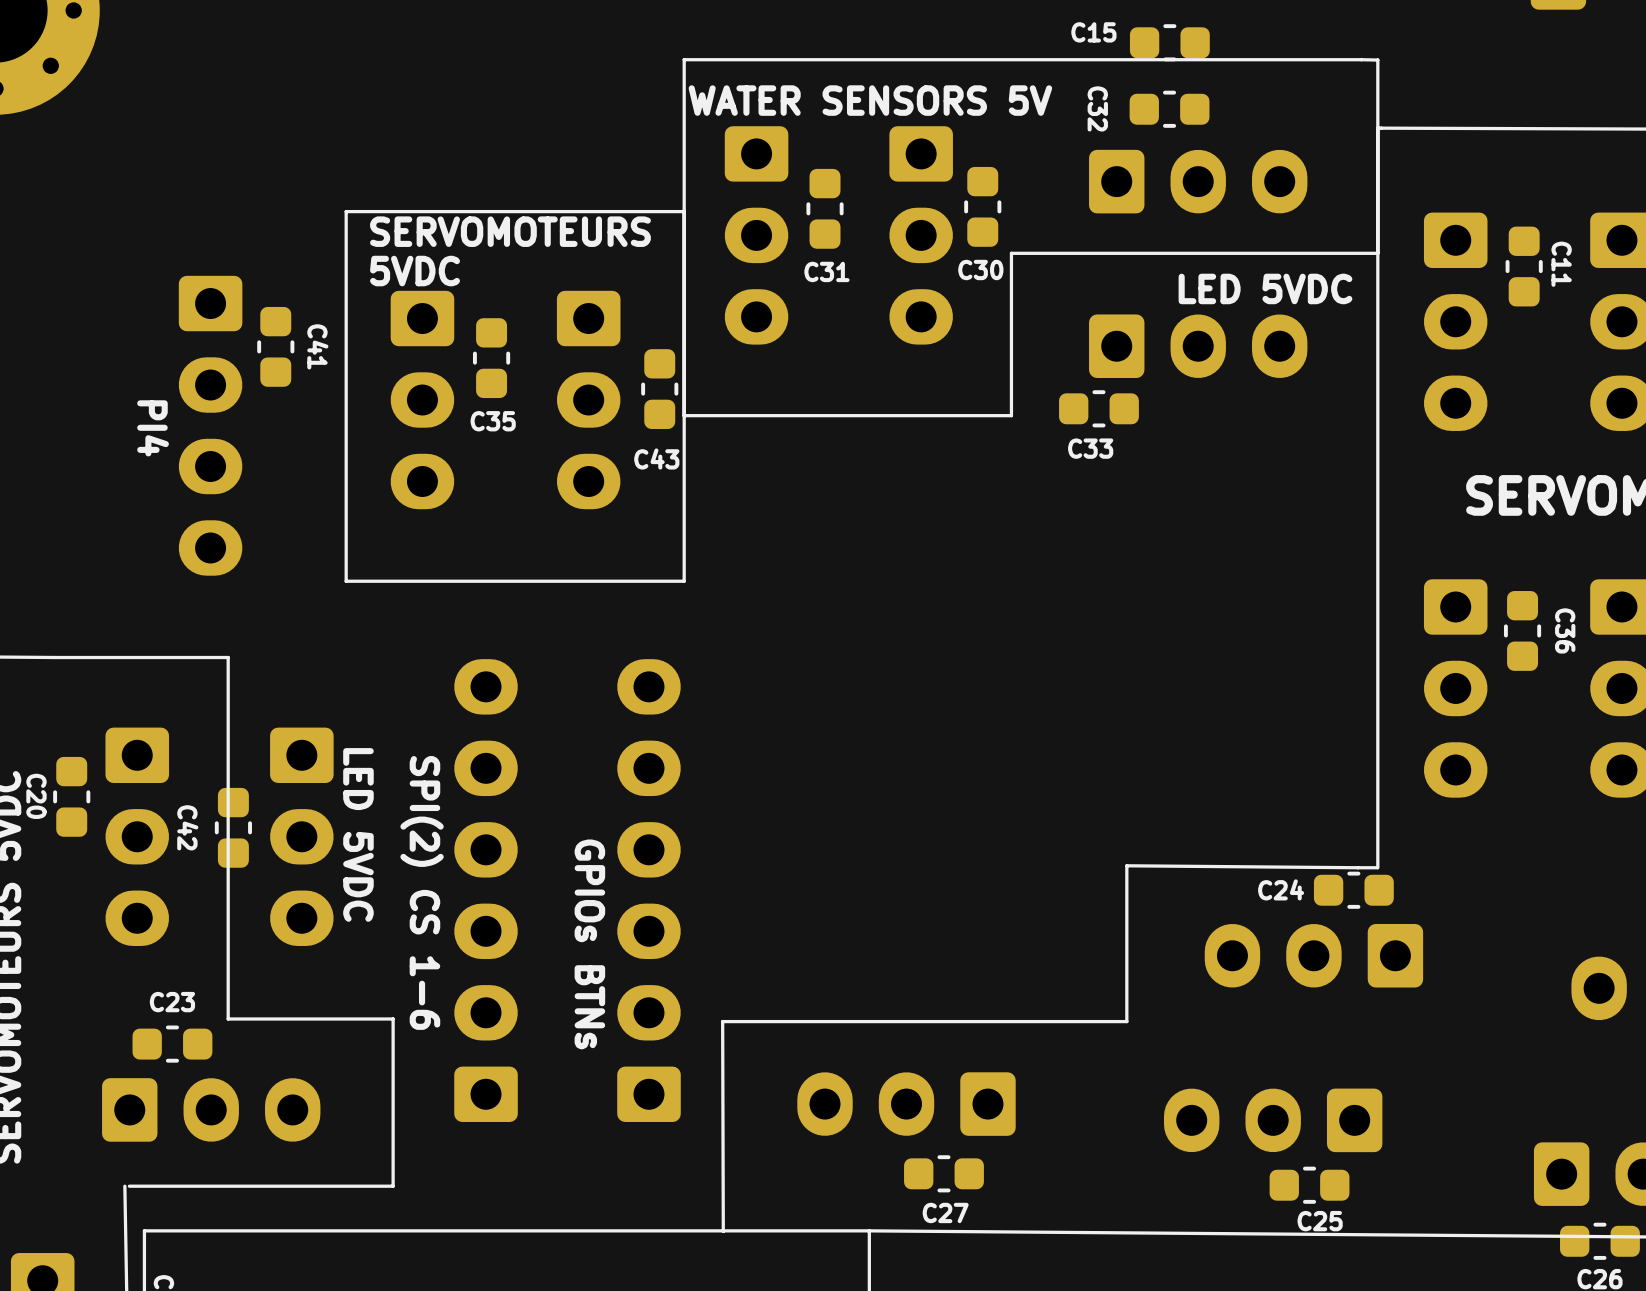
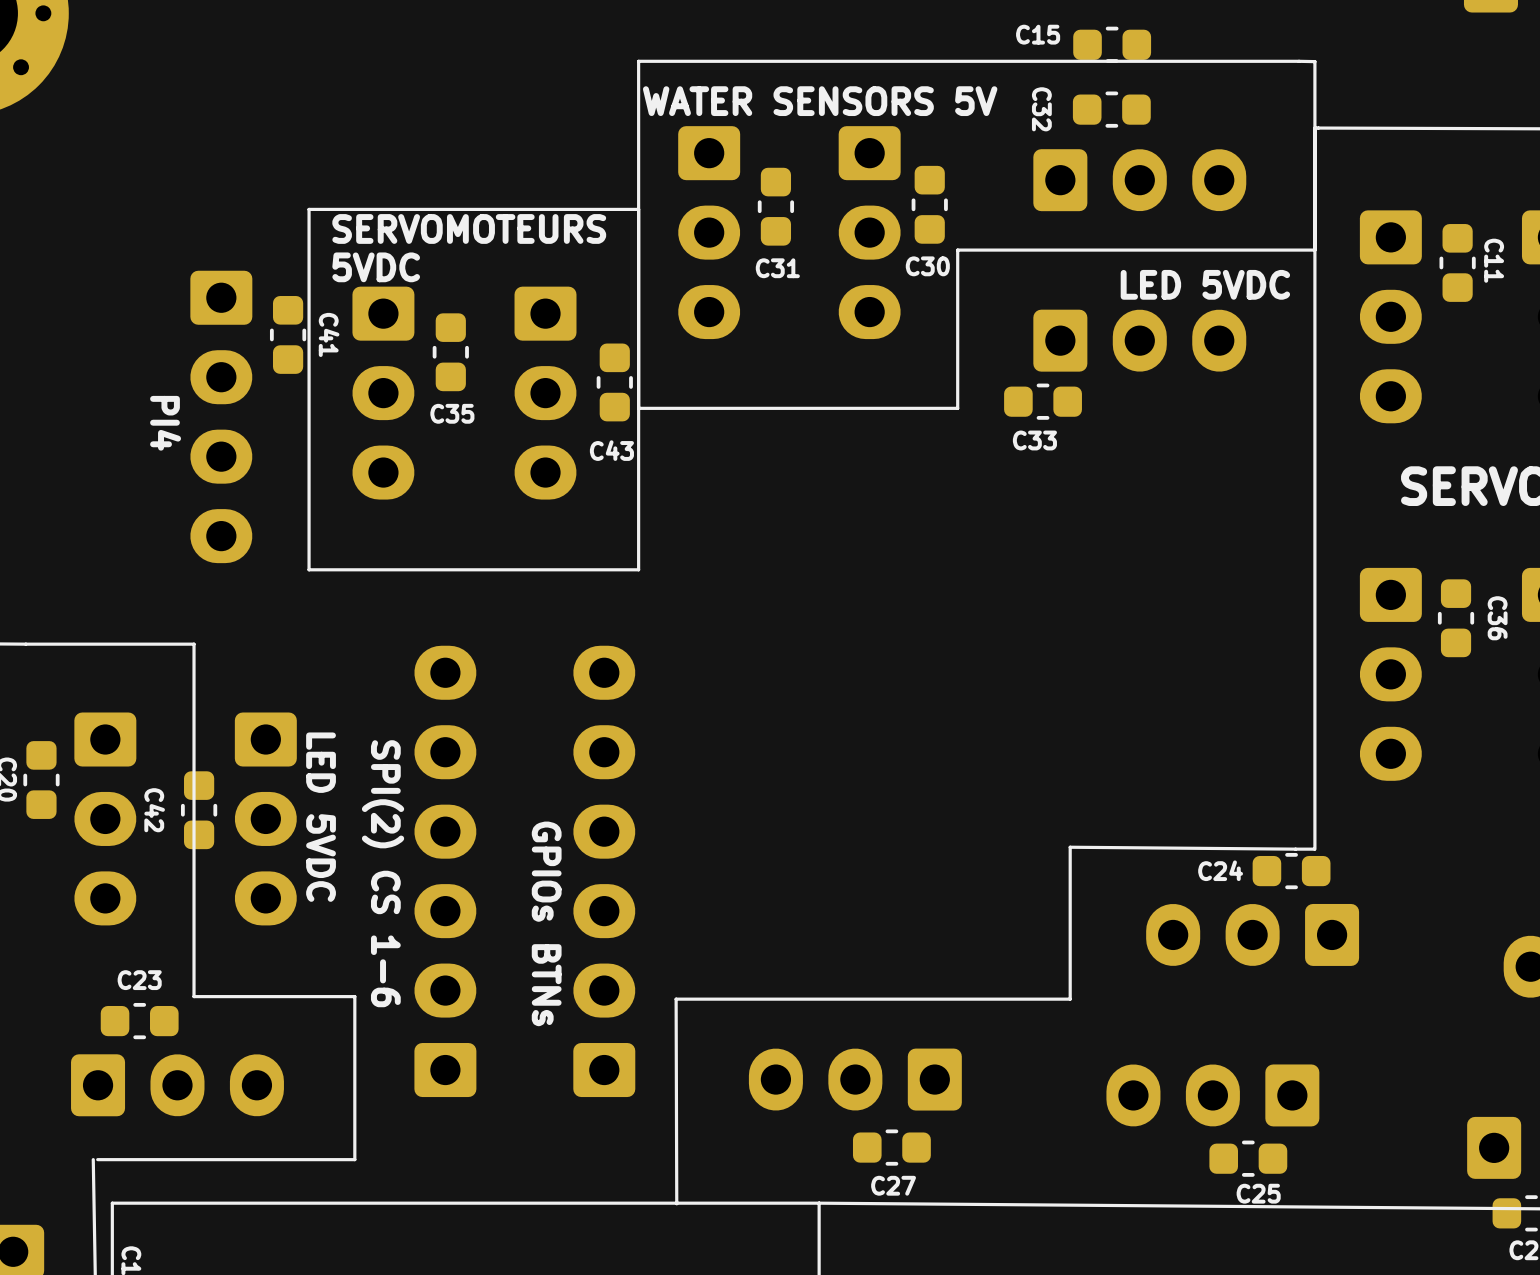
C41 position: (275, 346) -> (288, 334)
part position: (210, 425) -> (221, 416)
text position: PI4 (153, 428) -> PI4 (165, 423)

